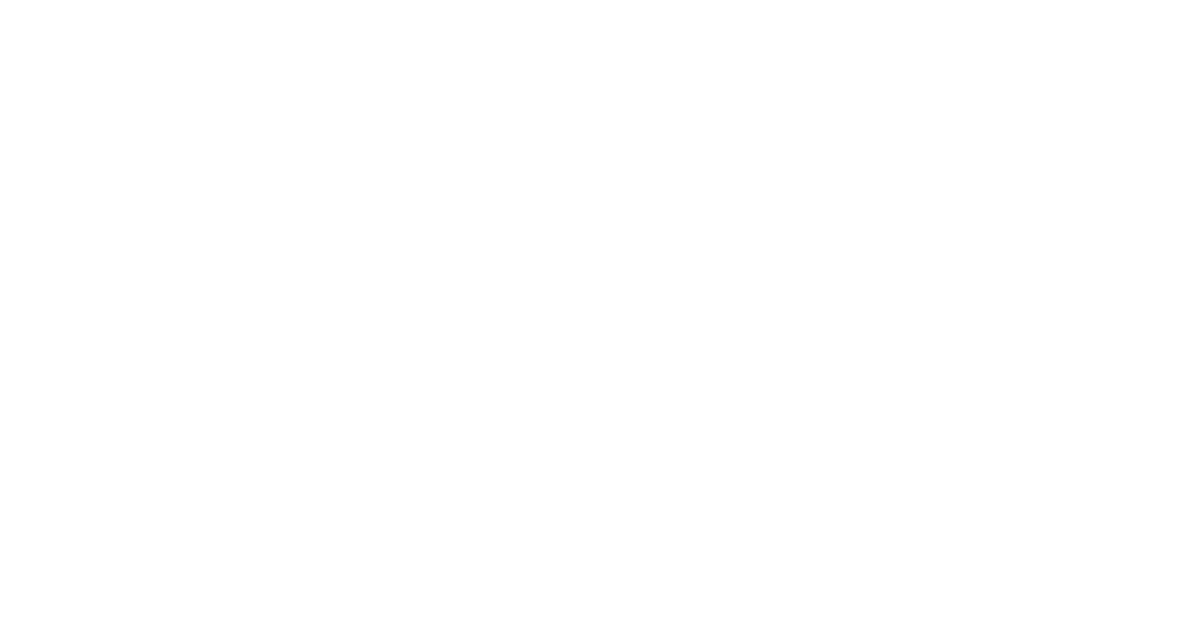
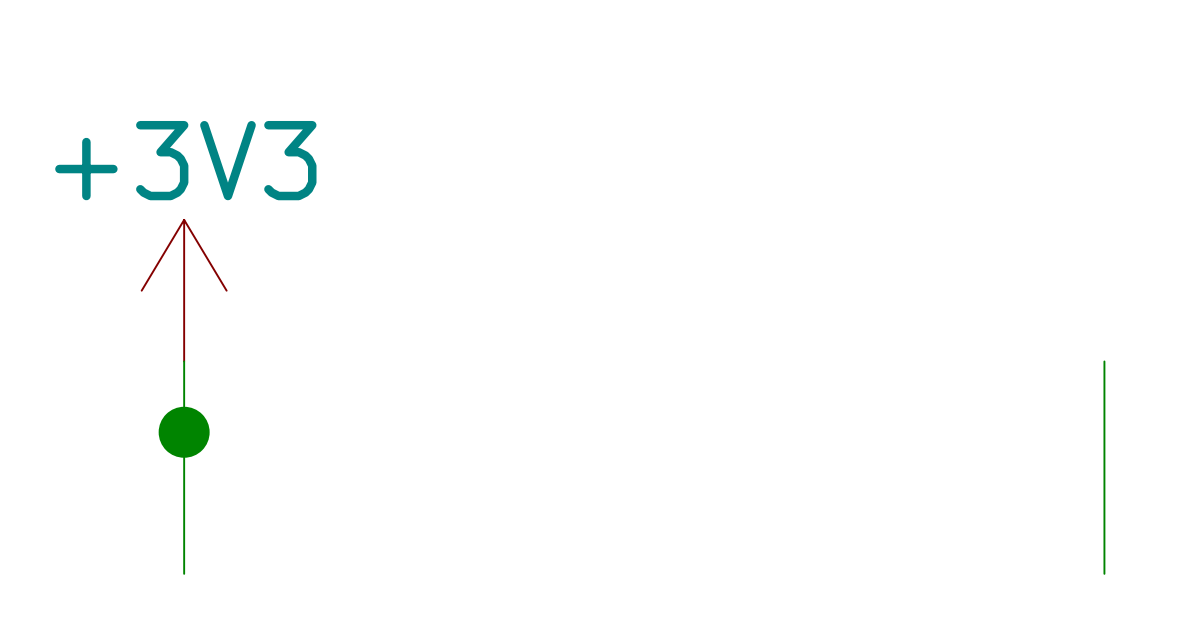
power symbol: none -> +3V3 (184, 290)
wire: none -> (184, 361) (184, 573)
wire: none -> (1104, 361) (1104, 573)
junction: none -> (184, 432)

